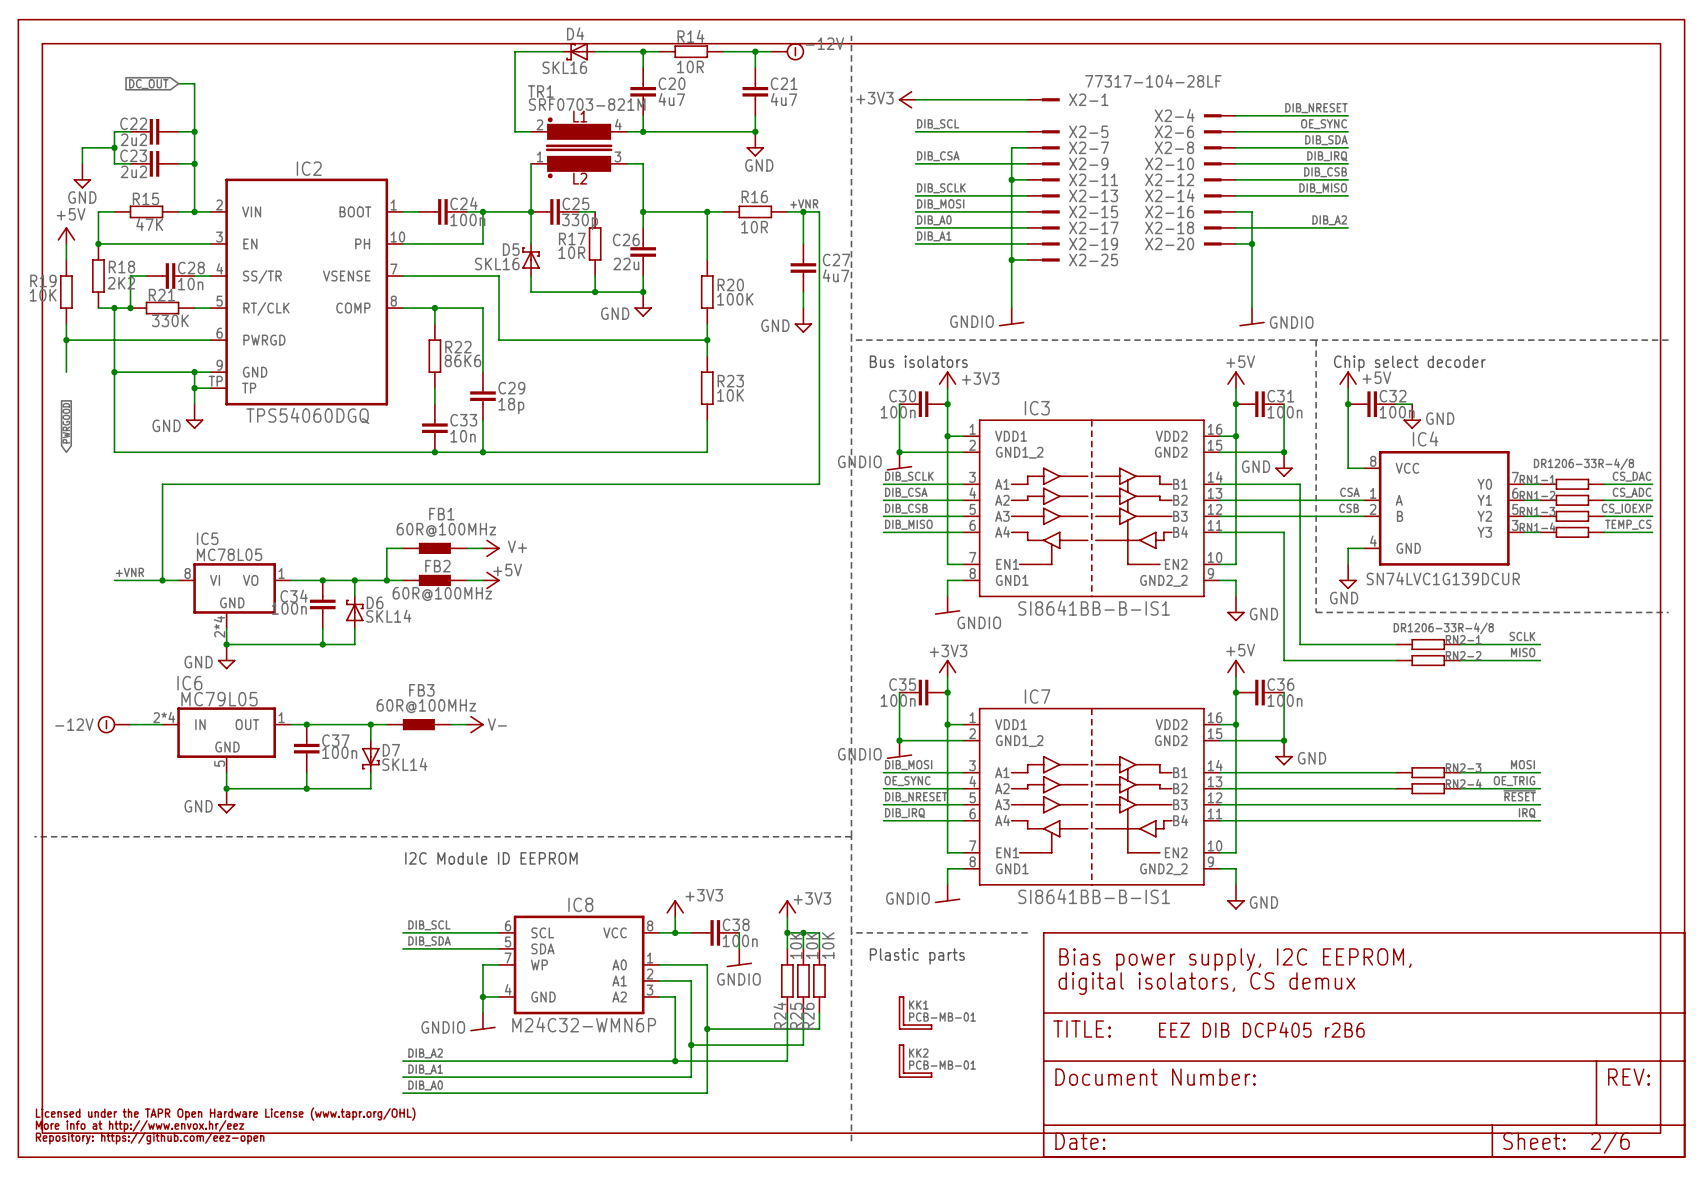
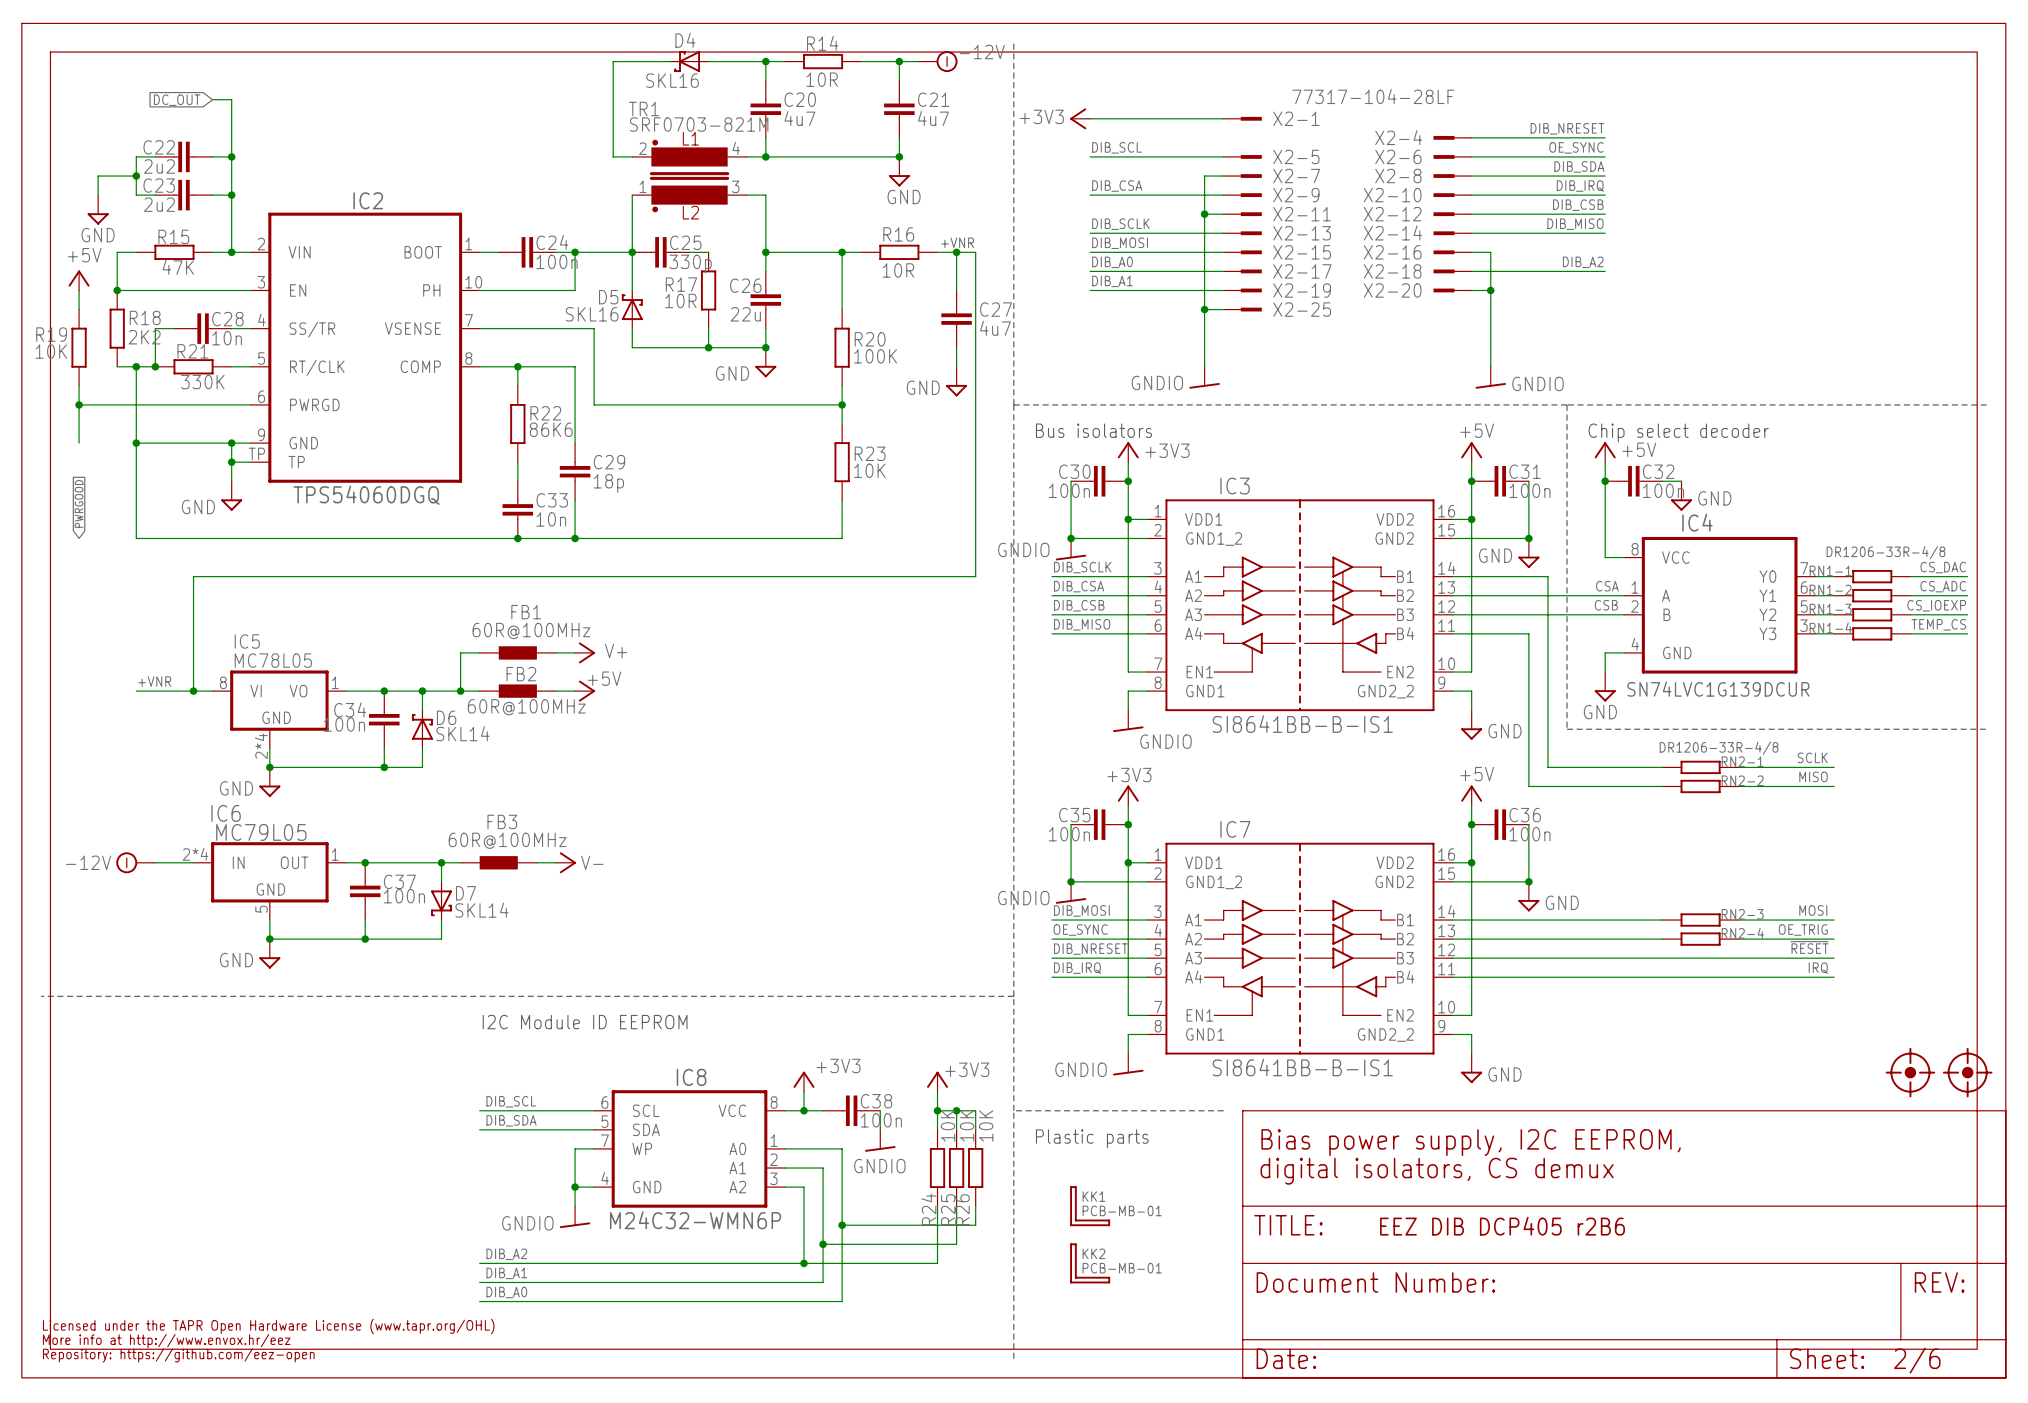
part: none -> (1910, 1072)
part: none -> (1967, 1072)

